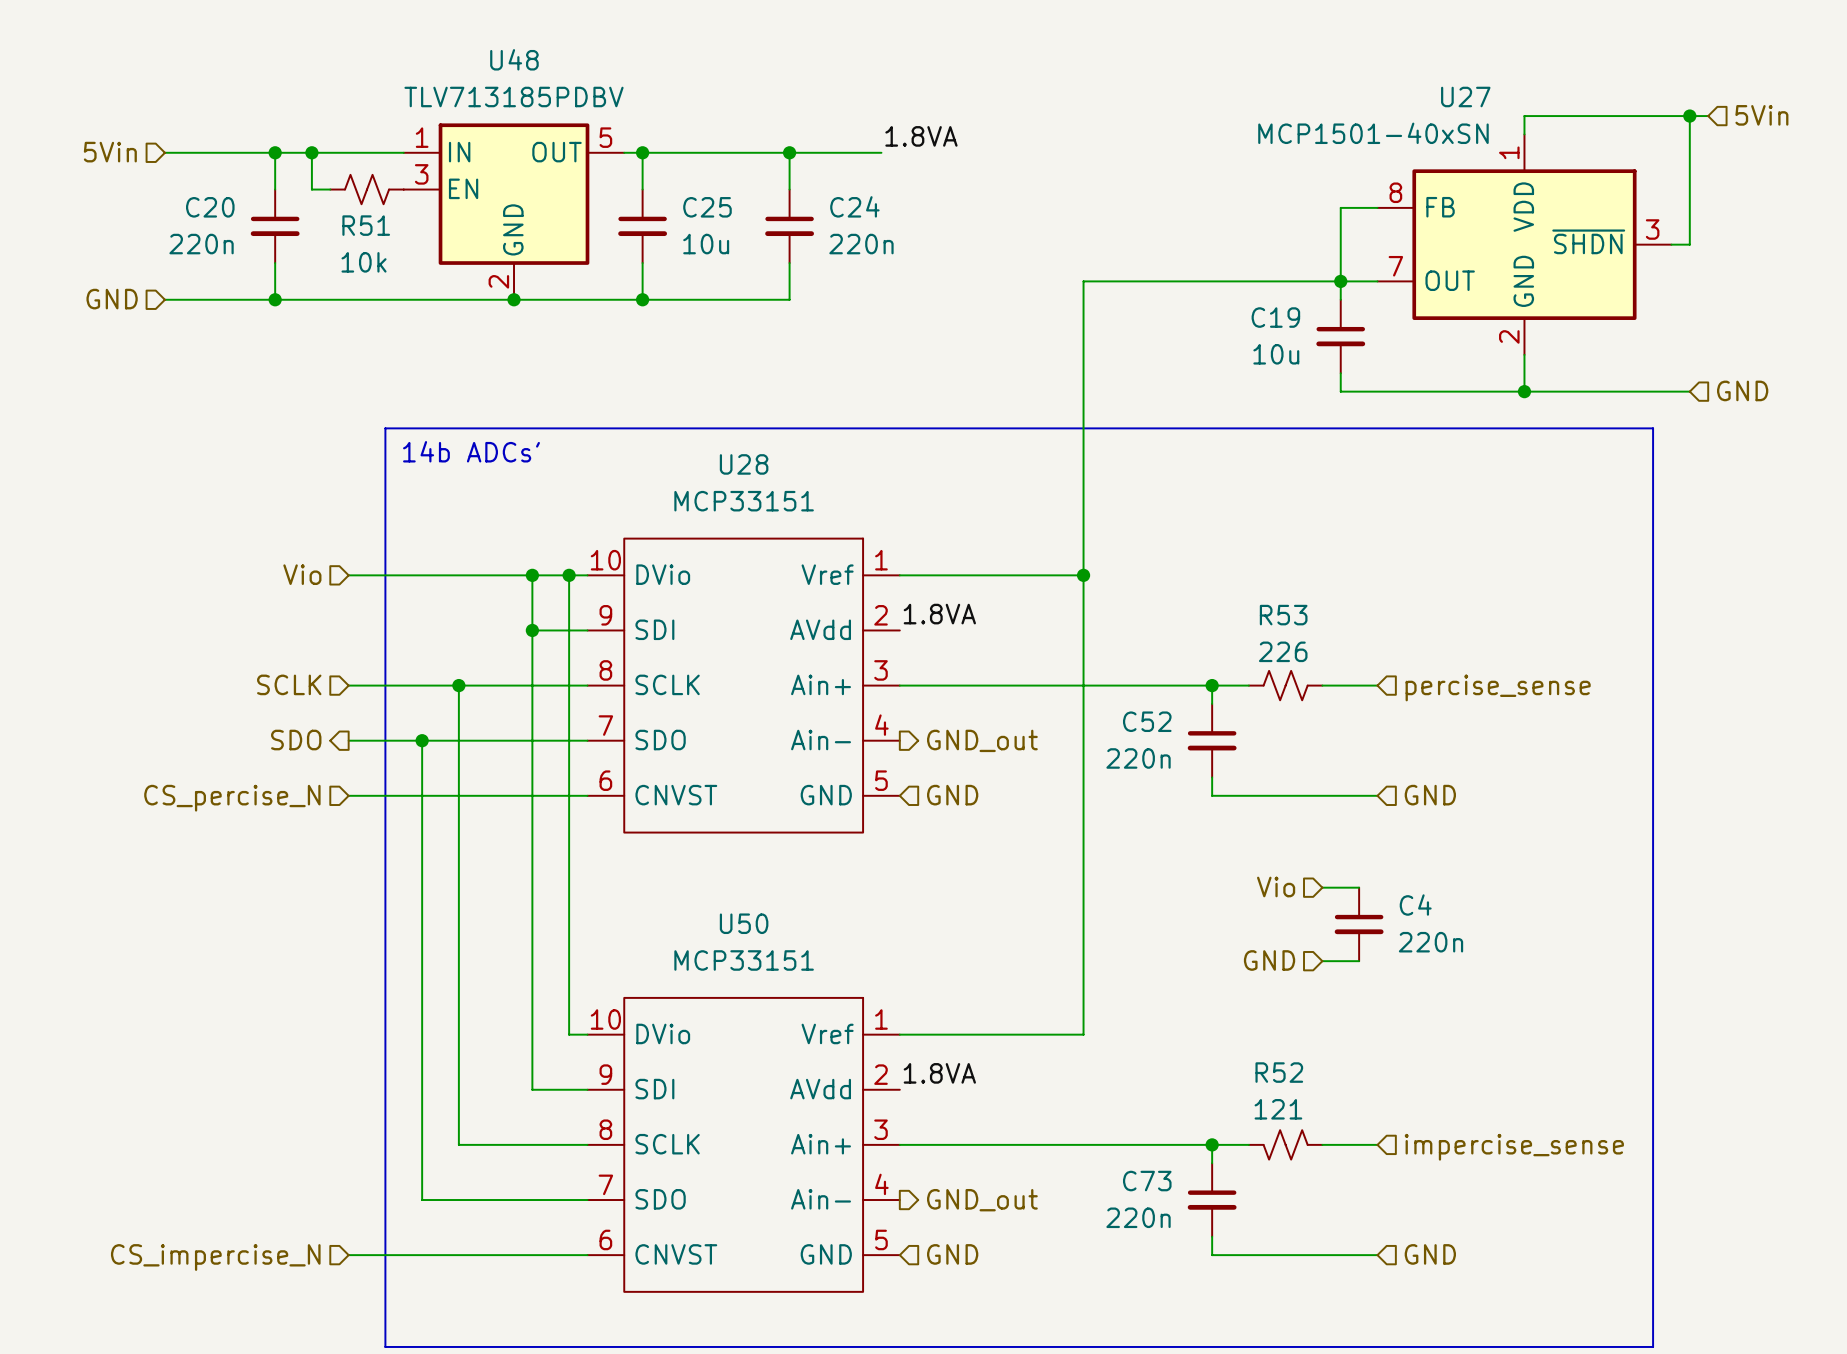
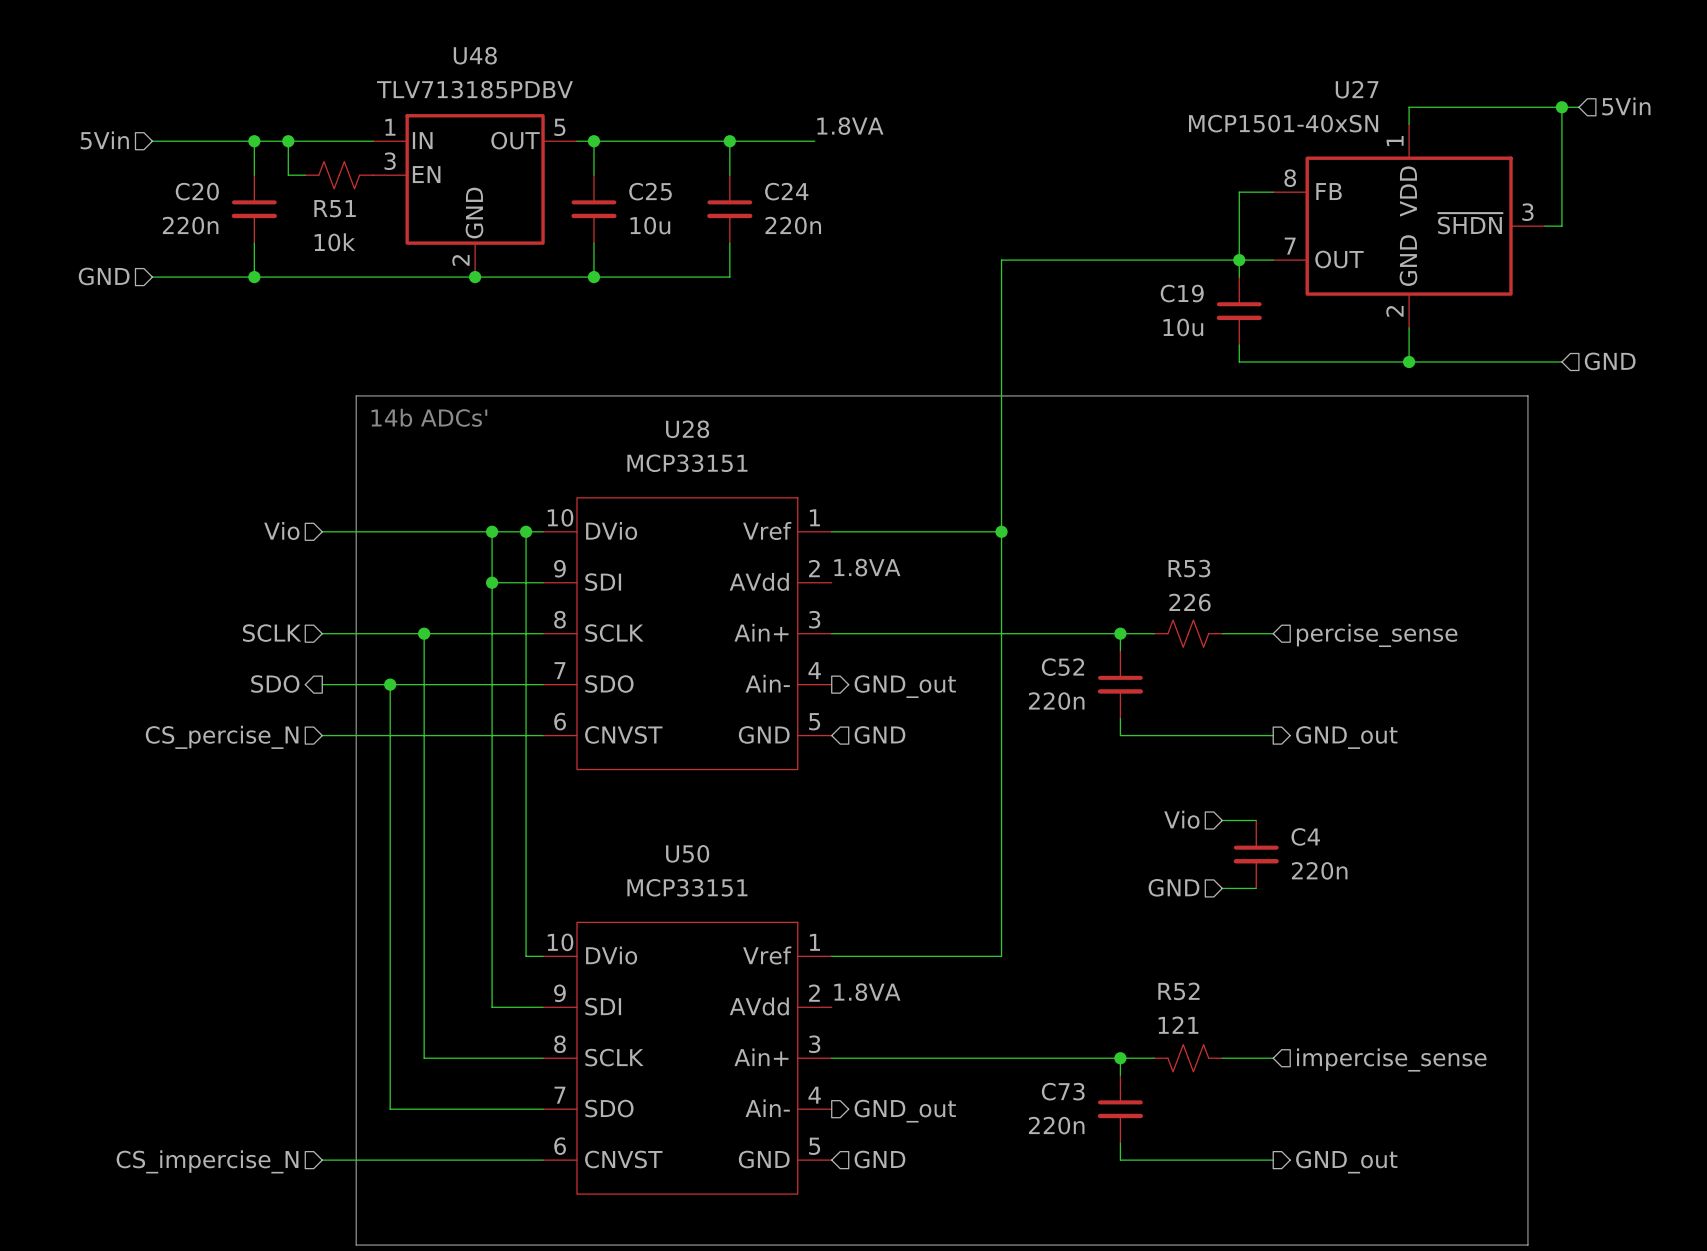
hierarchical label shape: input (1430, 795) -> output (1346, 737)
hierarchical label: GND (1430, 795) -> GND_out (1346, 737)
hierarchical label shape: input (1430, 1254) -> output (1346, 1162)
hierarchical label: GND (1430, 1254) -> GND_out (1346, 1162)

